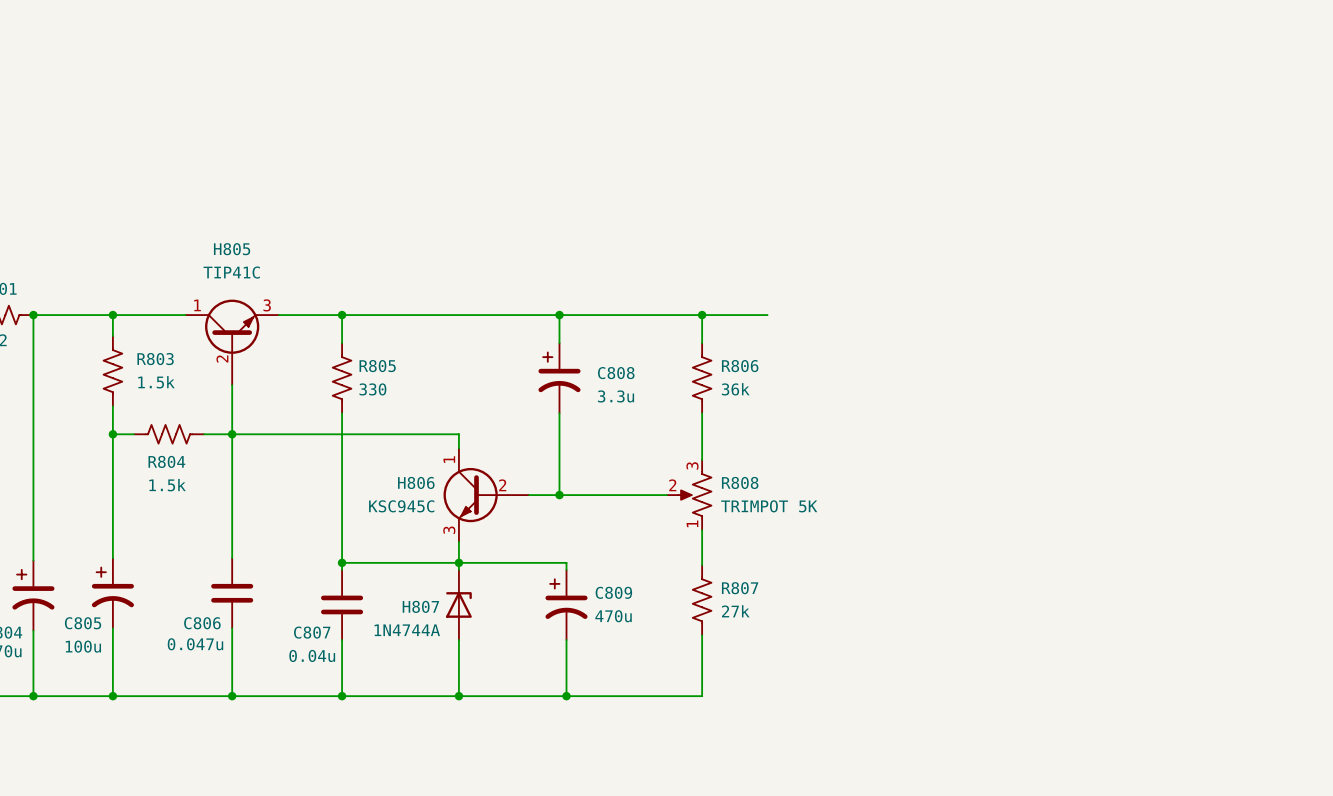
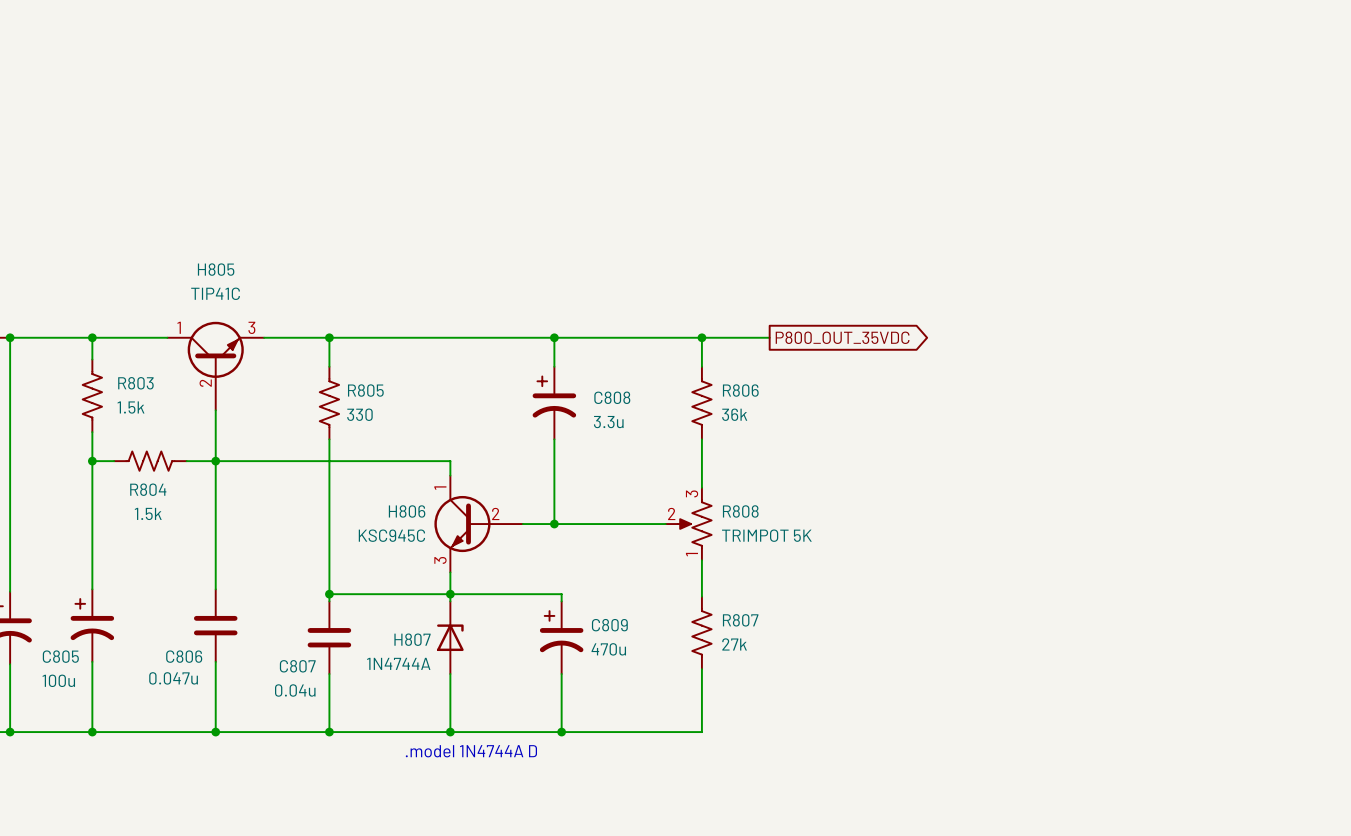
global label: none -> P800_OUT_35VDC (842, 337)
text: none -> .model 1N4744A D (471, 751)

